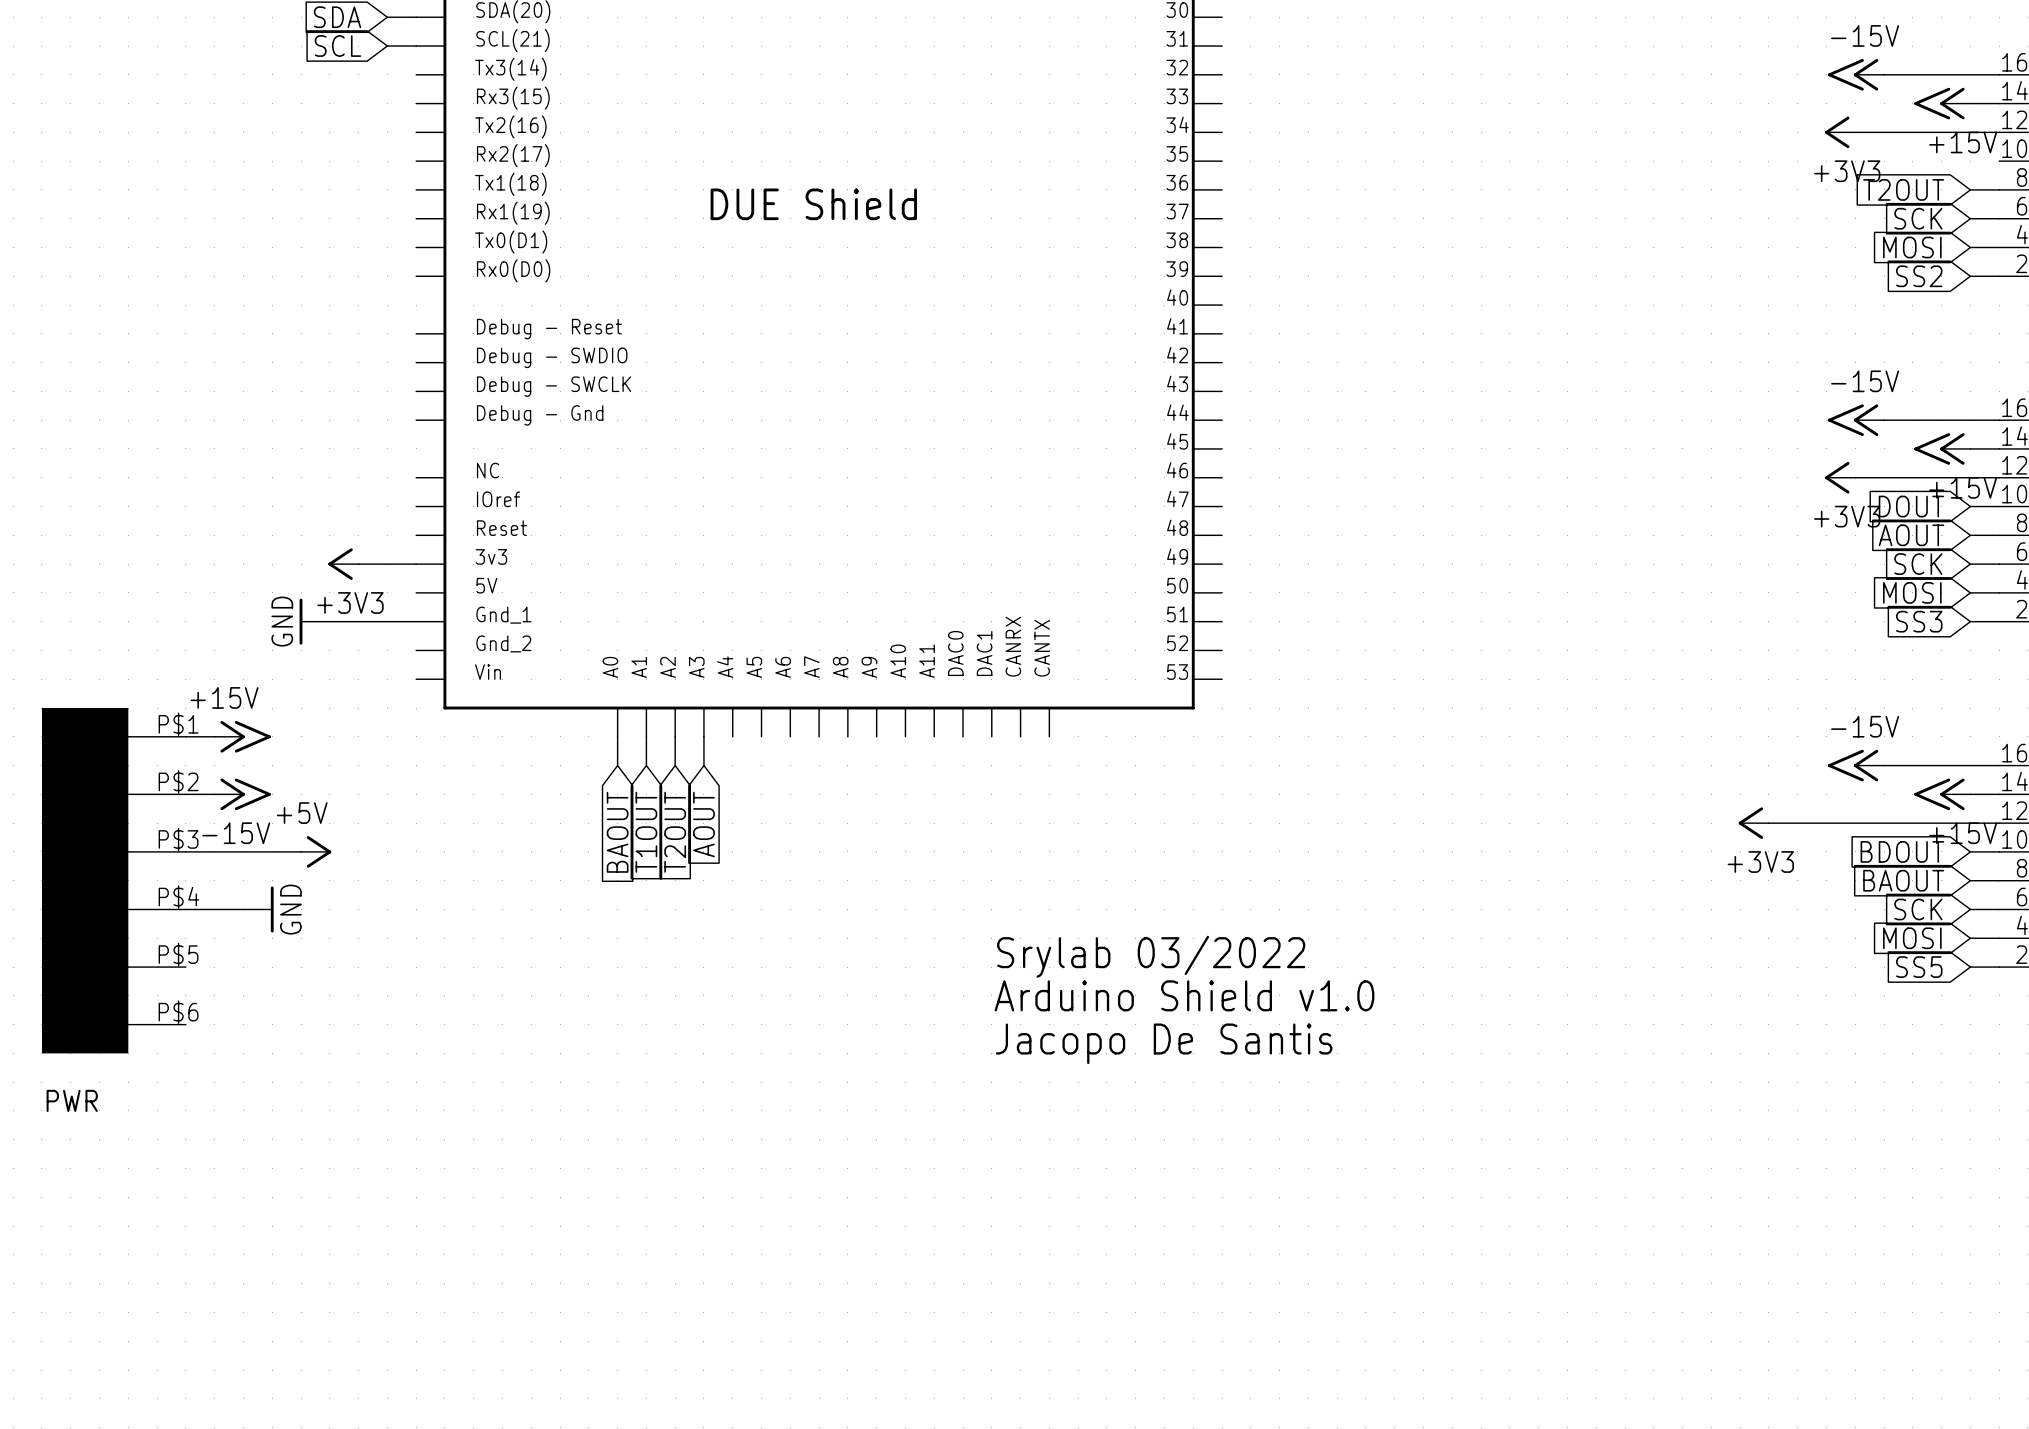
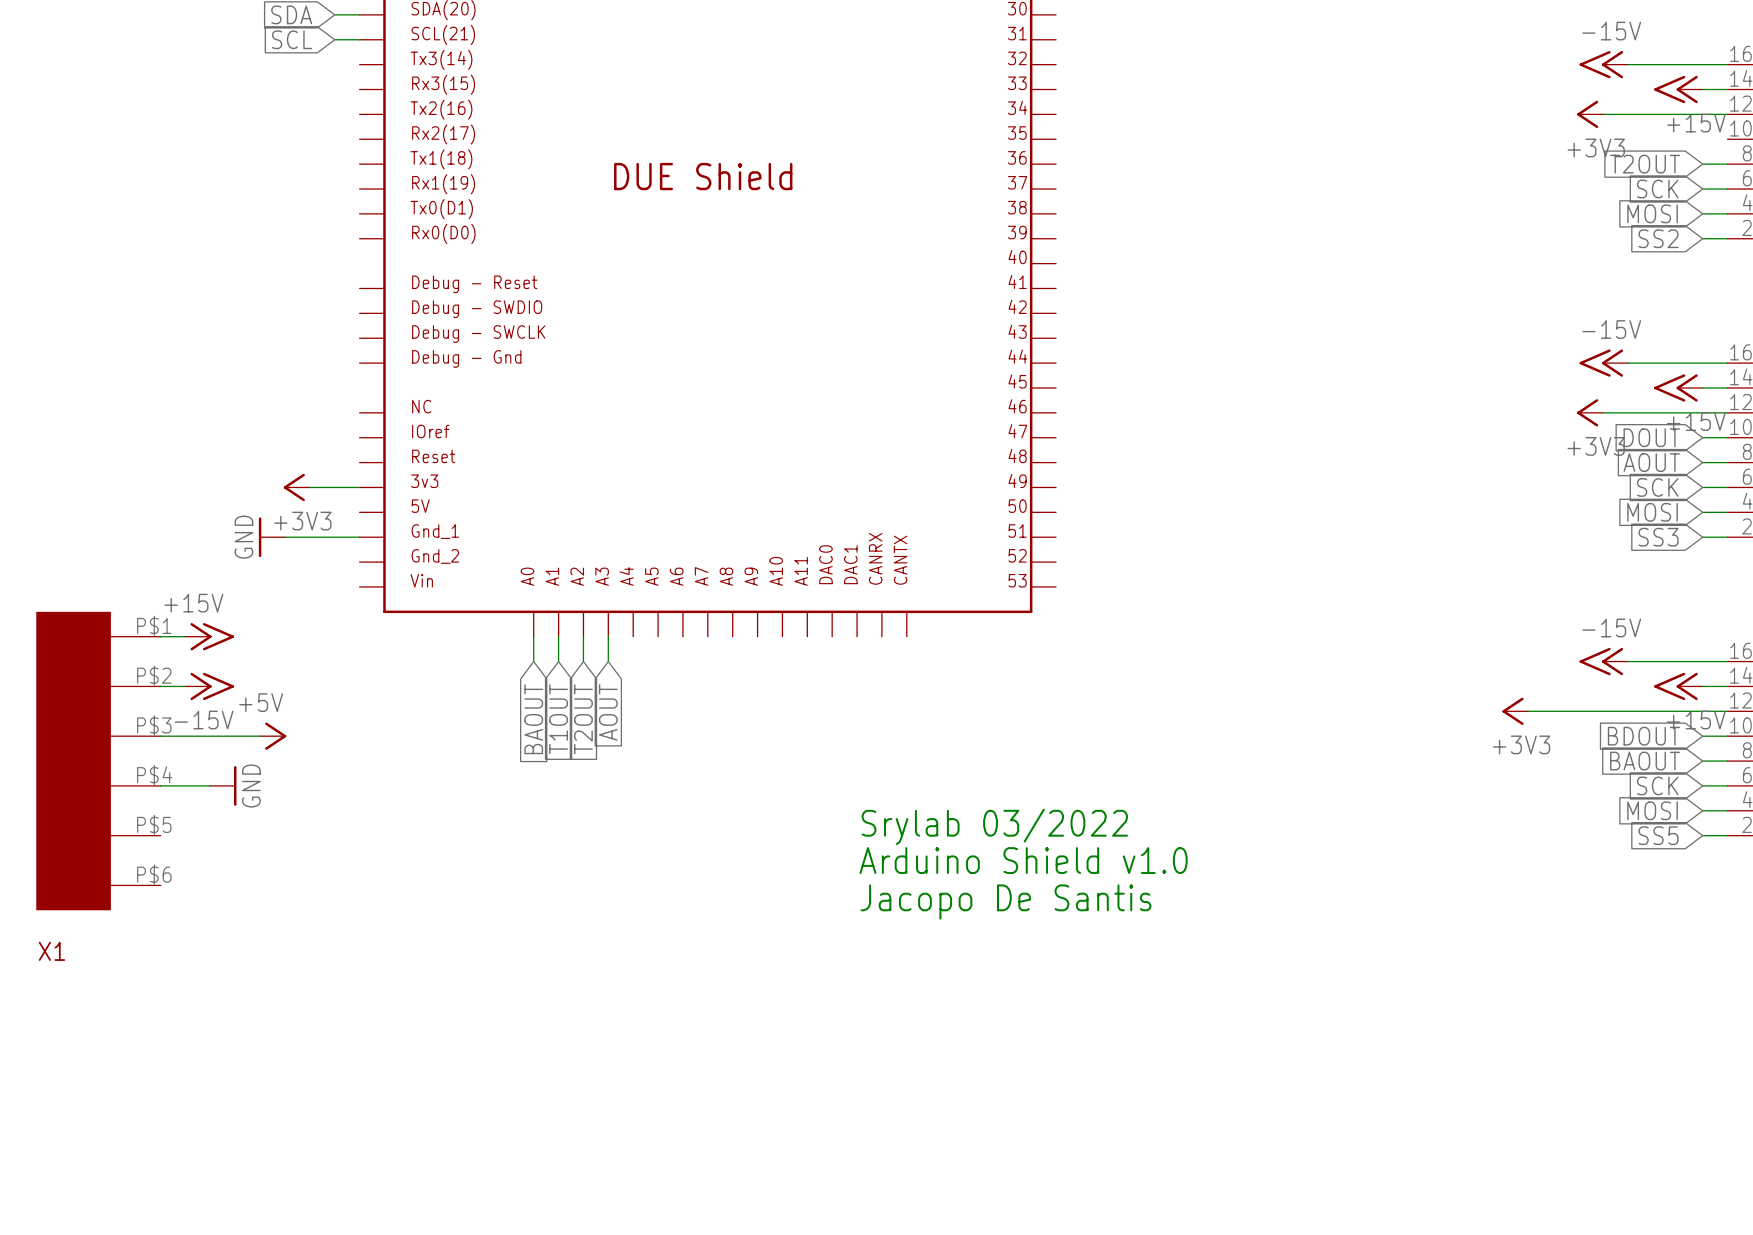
PWR name: PWR (72, 1100) -> X1 (51, 951)

